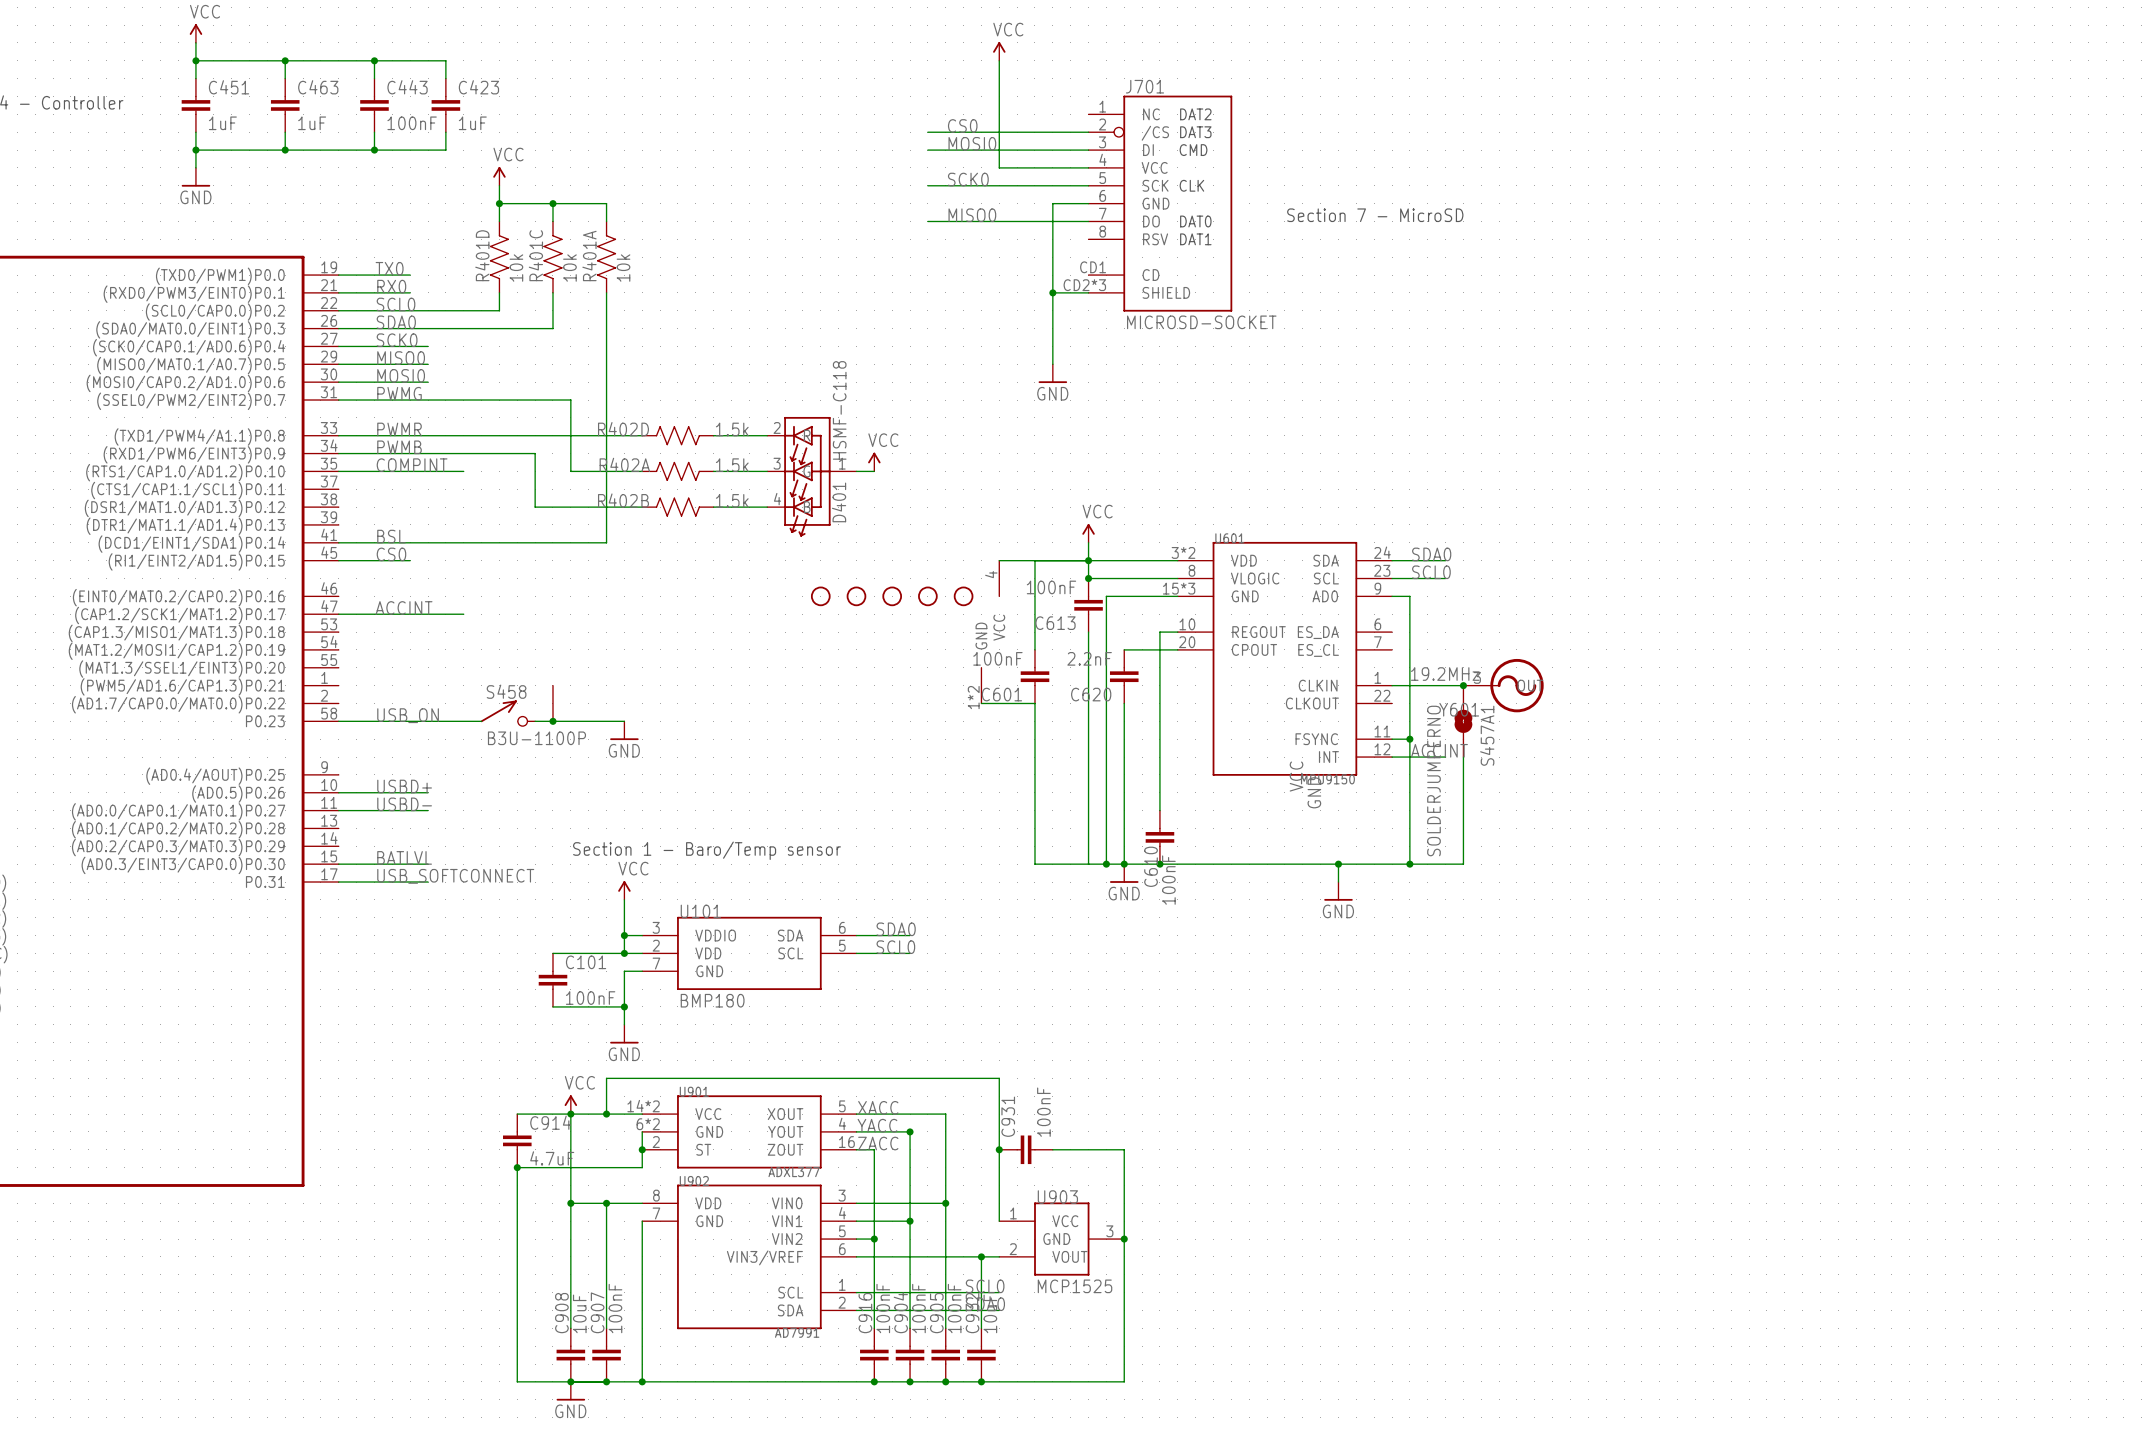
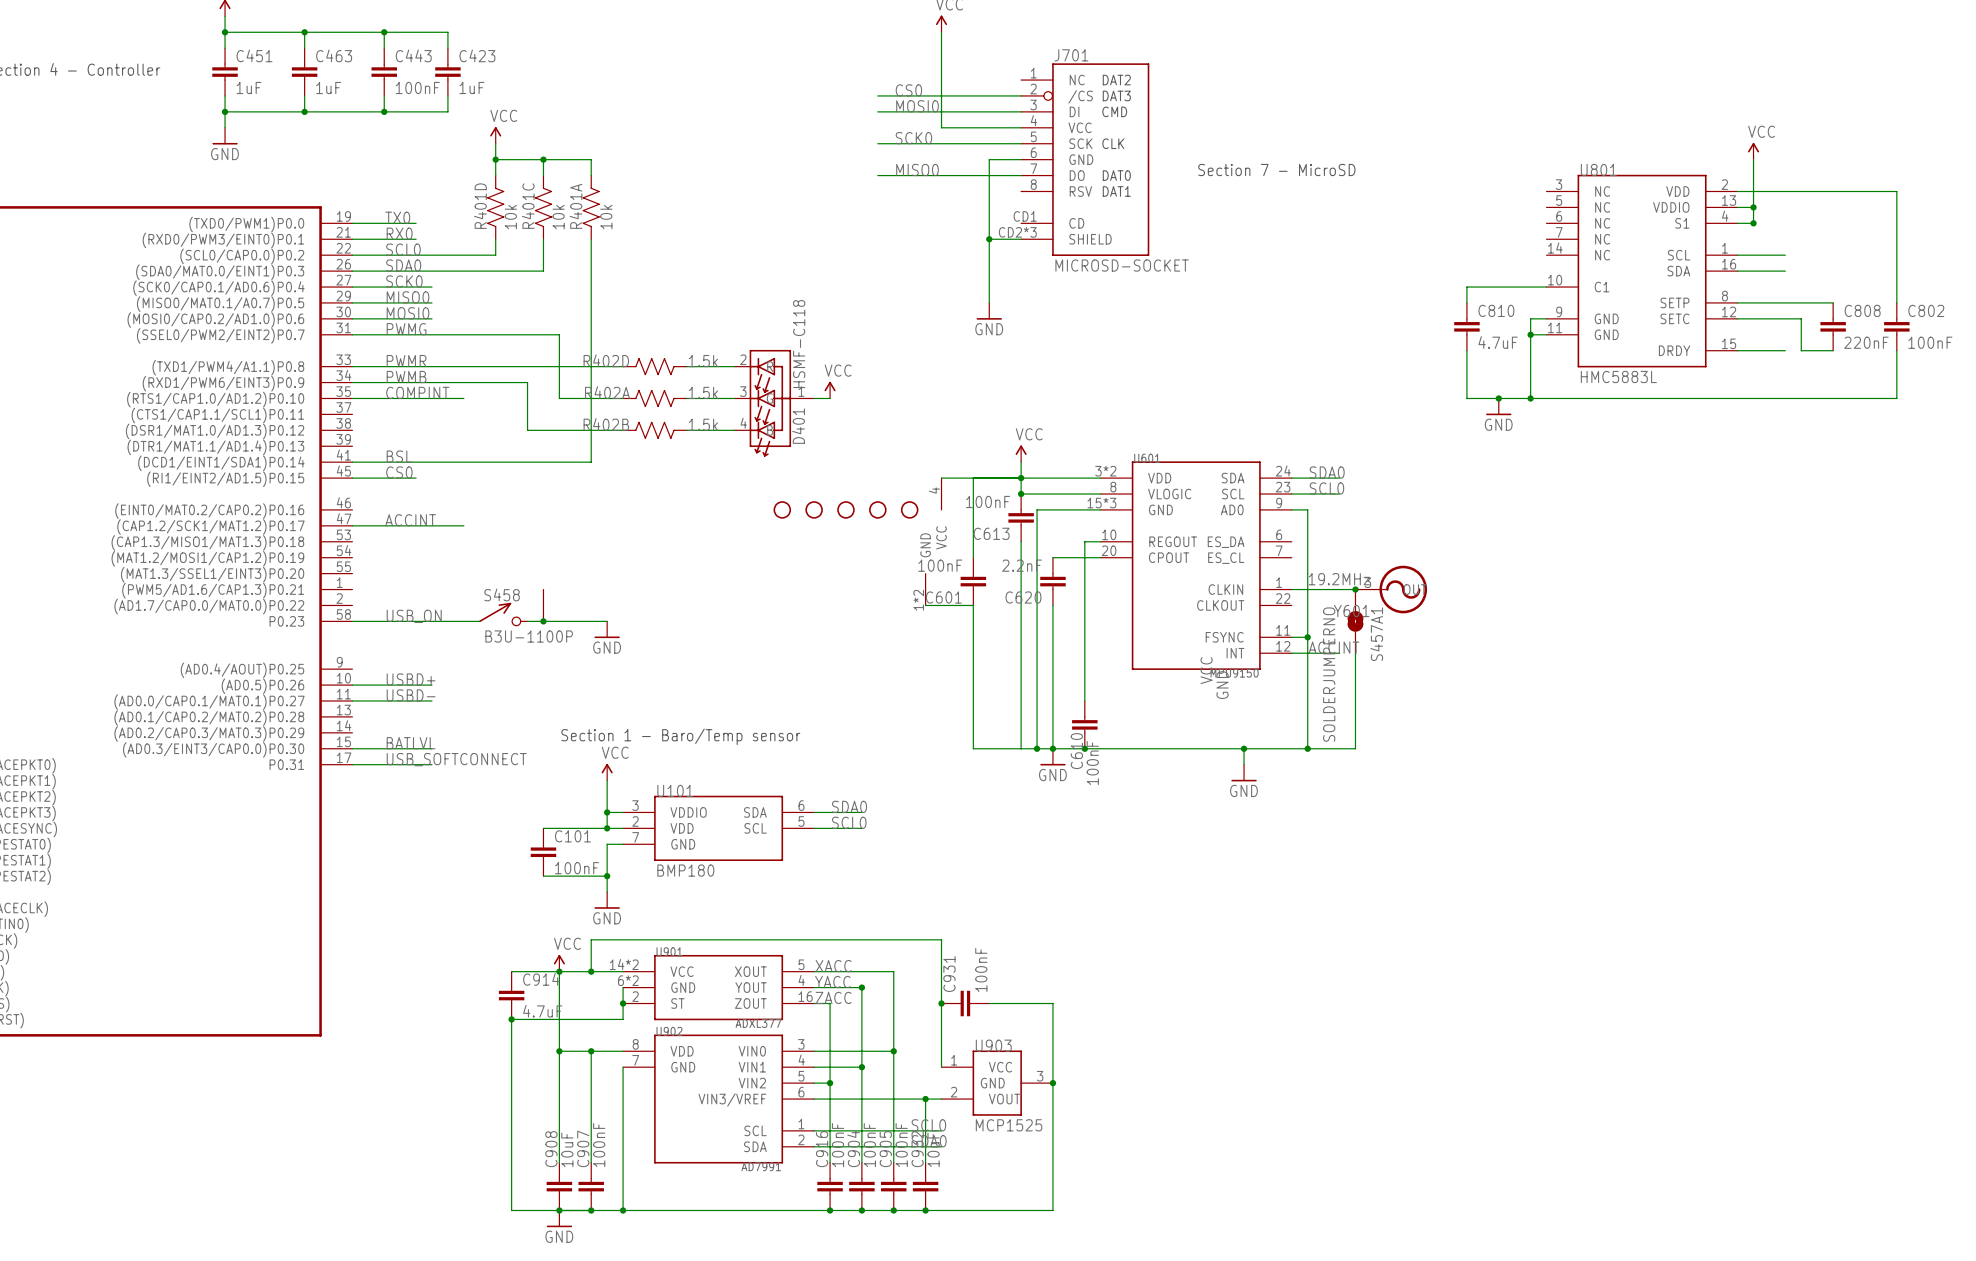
power symbol: none -> VCC (1753, 151)
wire: none -> (1753, 159) (1753, 223) (1737, 223)
wire: none -> (1737, 191) (1896, 191) (1896, 302)
wire: none -> (1737, 207) (1753, 207)
junction: none -> (1753, 207)
junction: none -> (1753, 223)
wire: none -> (1737, 255) (1785, 255)
U801: none -> HMC5883L (1642, 271)
wire: none -> (1737, 271) (1785, 271)
wire: none -> (1546, 287) (1466, 287) (1466, 302)
wire: none -> (1737, 302) (1833, 302)
wire: none -> (1546, 318) (1530, 318) (1530, 398)
wire: none -> (1737, 318) (1801, 318) (1801, 350) (1833, 350)
C810: none -> 4.7uF (1466, 326)
C808: none -> 220nF (1833, 326)
C802: none -> 100nF (1896, 326)
wire: none -> (1530, 334) (1546, 334)
junction: none -> (1530, 334)
wire: none -> (1466, 350) (1466, 398) (1896, 398) (1896, 350)
wire: none -> (1737, 350) (1785, 350)
junction: none -> (1498, 398)
junction: none -> (1530, 398)
power symbol: none -> GND (1498, 406)

